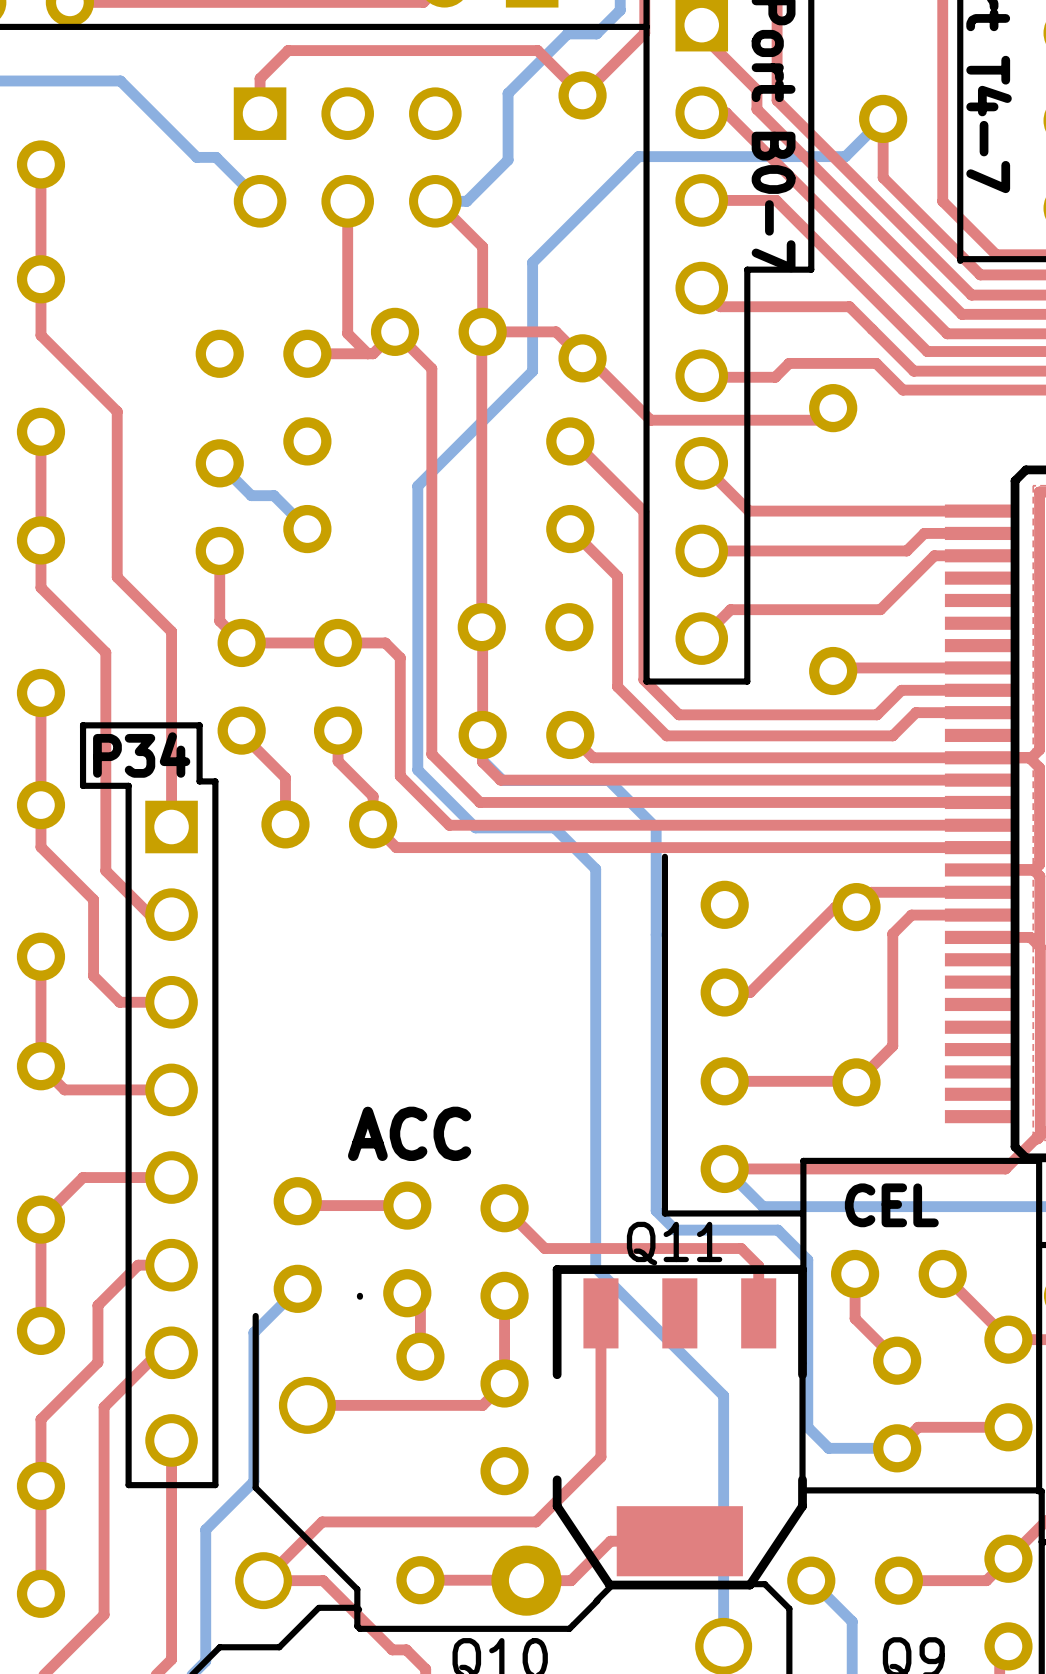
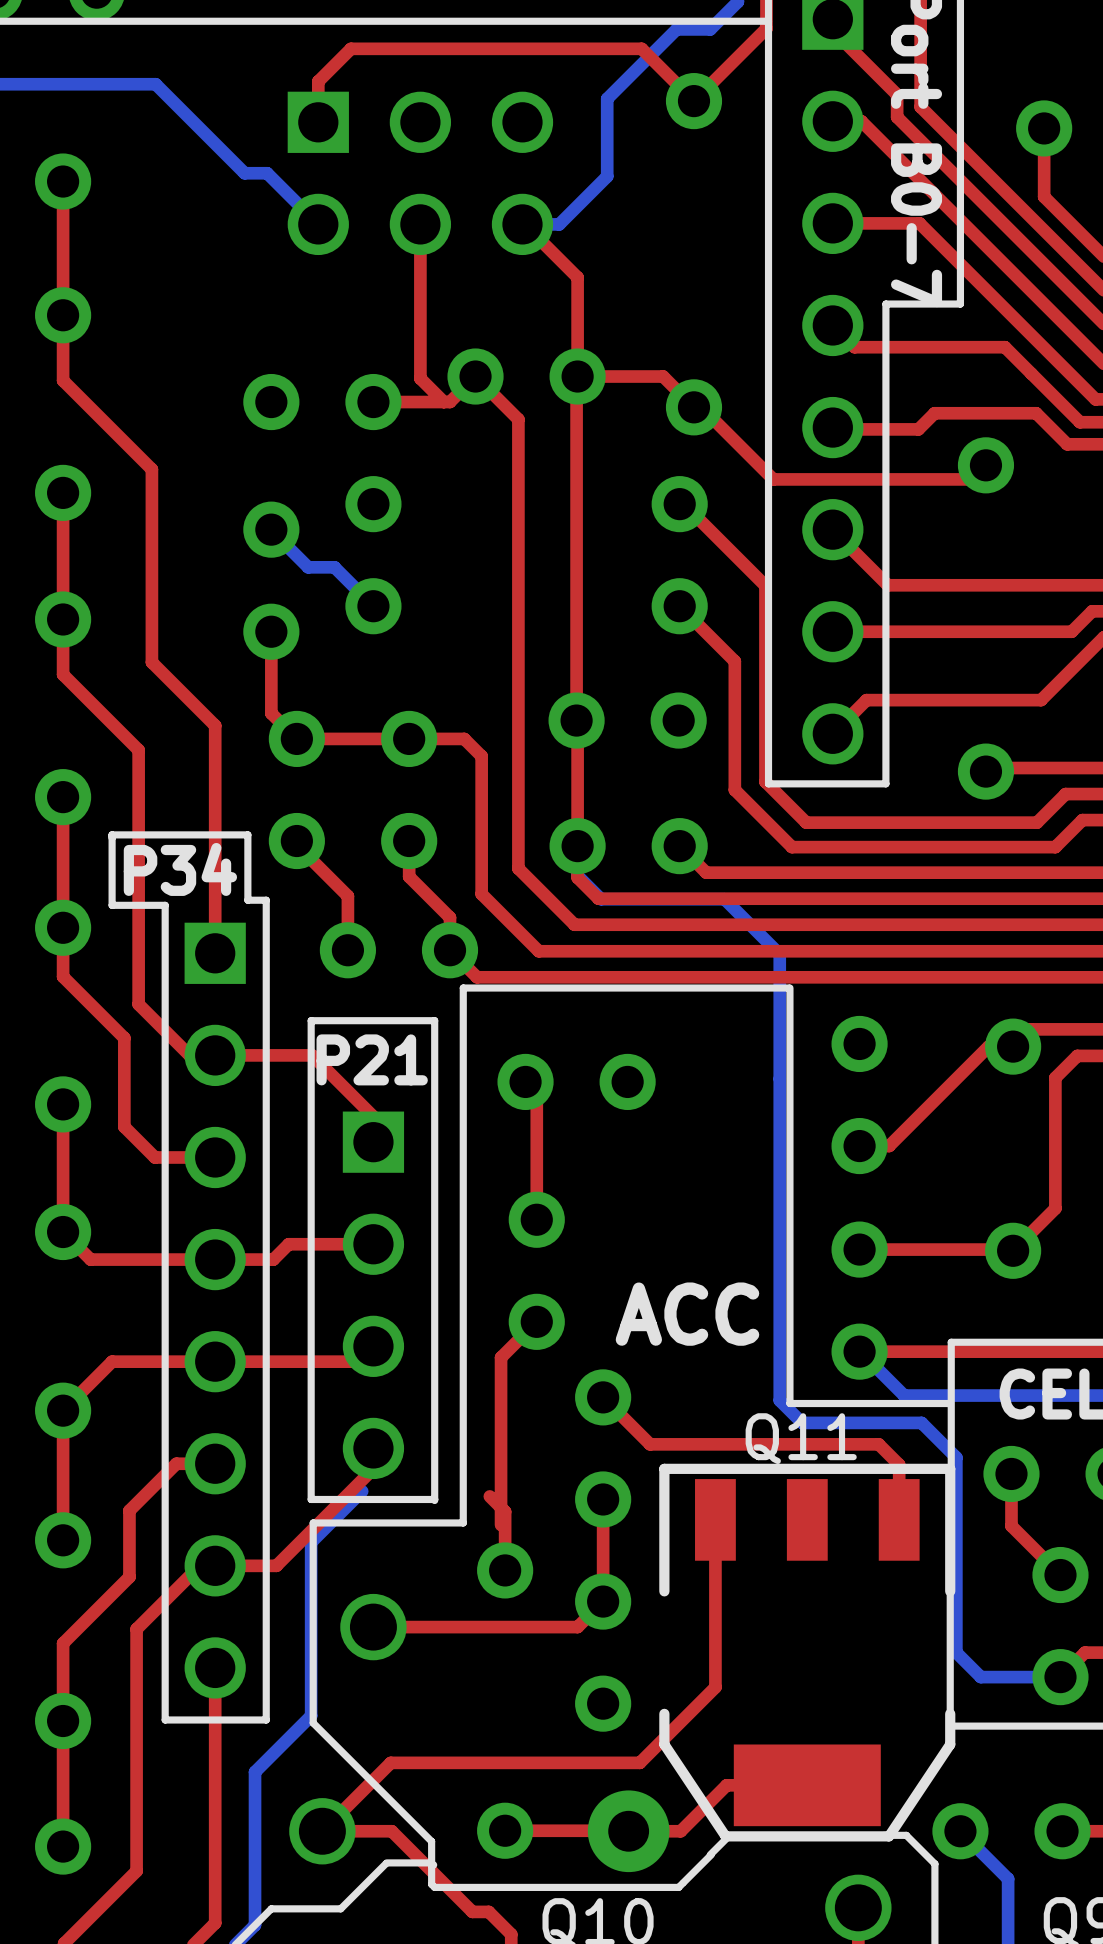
bottom track: (883, 118) (845, 156) (638, 156) (532, 262) (532, 371) (417, 486) (417, 770) (475, 827) (554, 827) (595, 869) (595, 1267) (723, 1395) (723, 1646) -> none
line: none -> (788, 988) (463, 988) (463, 1522) (313, 1522)
line: none -> (311, 1020) (311, 1499) (434, 1499) (434, 1020) (311, 1020)
top track: none -> (215, 1055) (312, 1055) (373, 1116) (373, 1142)
text: none -> P21 (372, 1059)
top track: none -> (525, 1081) (536, 1093) (536, 1219)
part: none -> (576, 1081)
top track: none -> (373, 1244) (288, 1244) (273, 1259) (215, 1259)
part: none -> (536, 1270)
part: none -> (373, 1295)
text position: ACC (409, 1133) -> ACC (687, 1314)
top track: none -> (536, 1321) (501, 1357) (501, 1525)
top track: none -> (373, 1346) (358, 1361) (215, 1361)
top track: (297, 1201) (302, 1205) (407, 1205) -> none
part: (297, 1245) -> none
part: (407, 1249) -> none
top track: none -> (373, 1448) (373, 1468) (276, 1565) (215, 1565)

